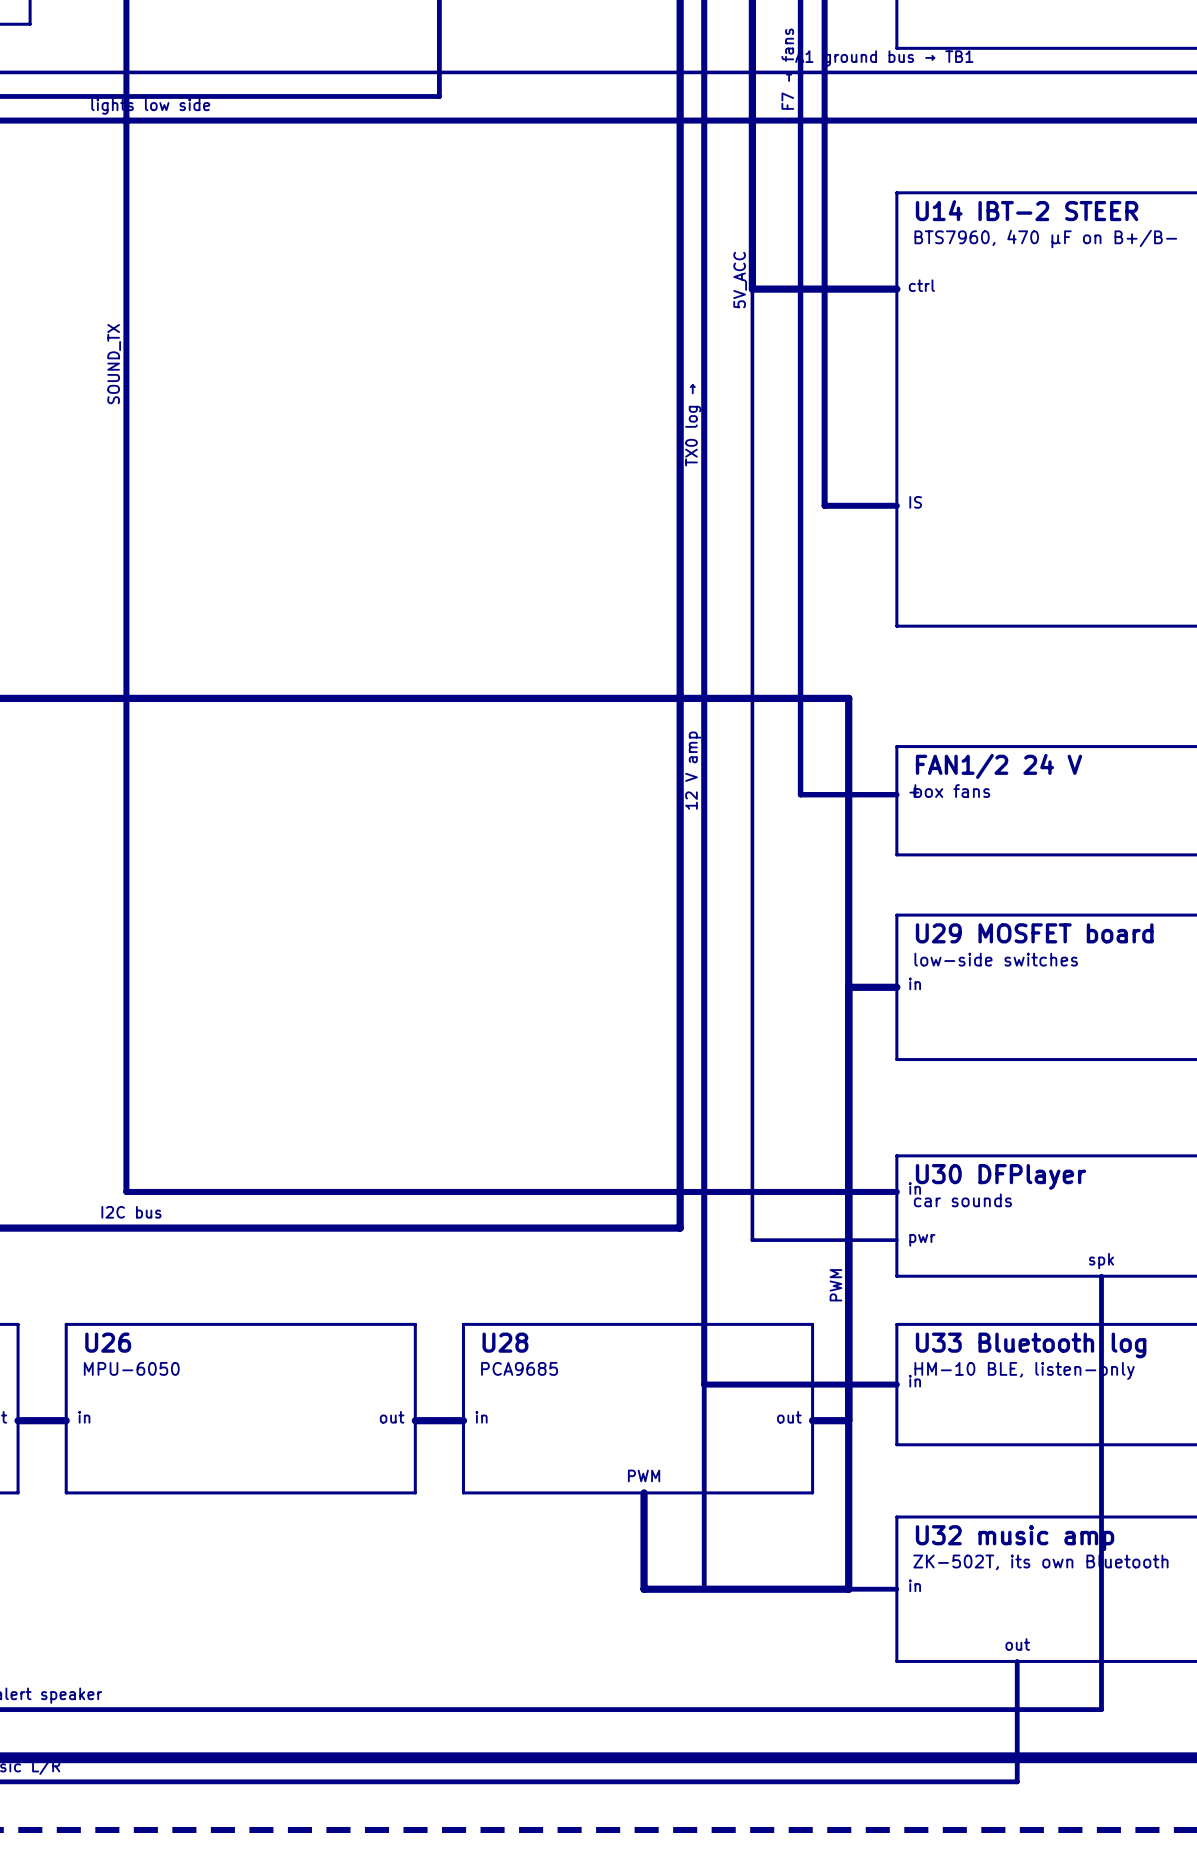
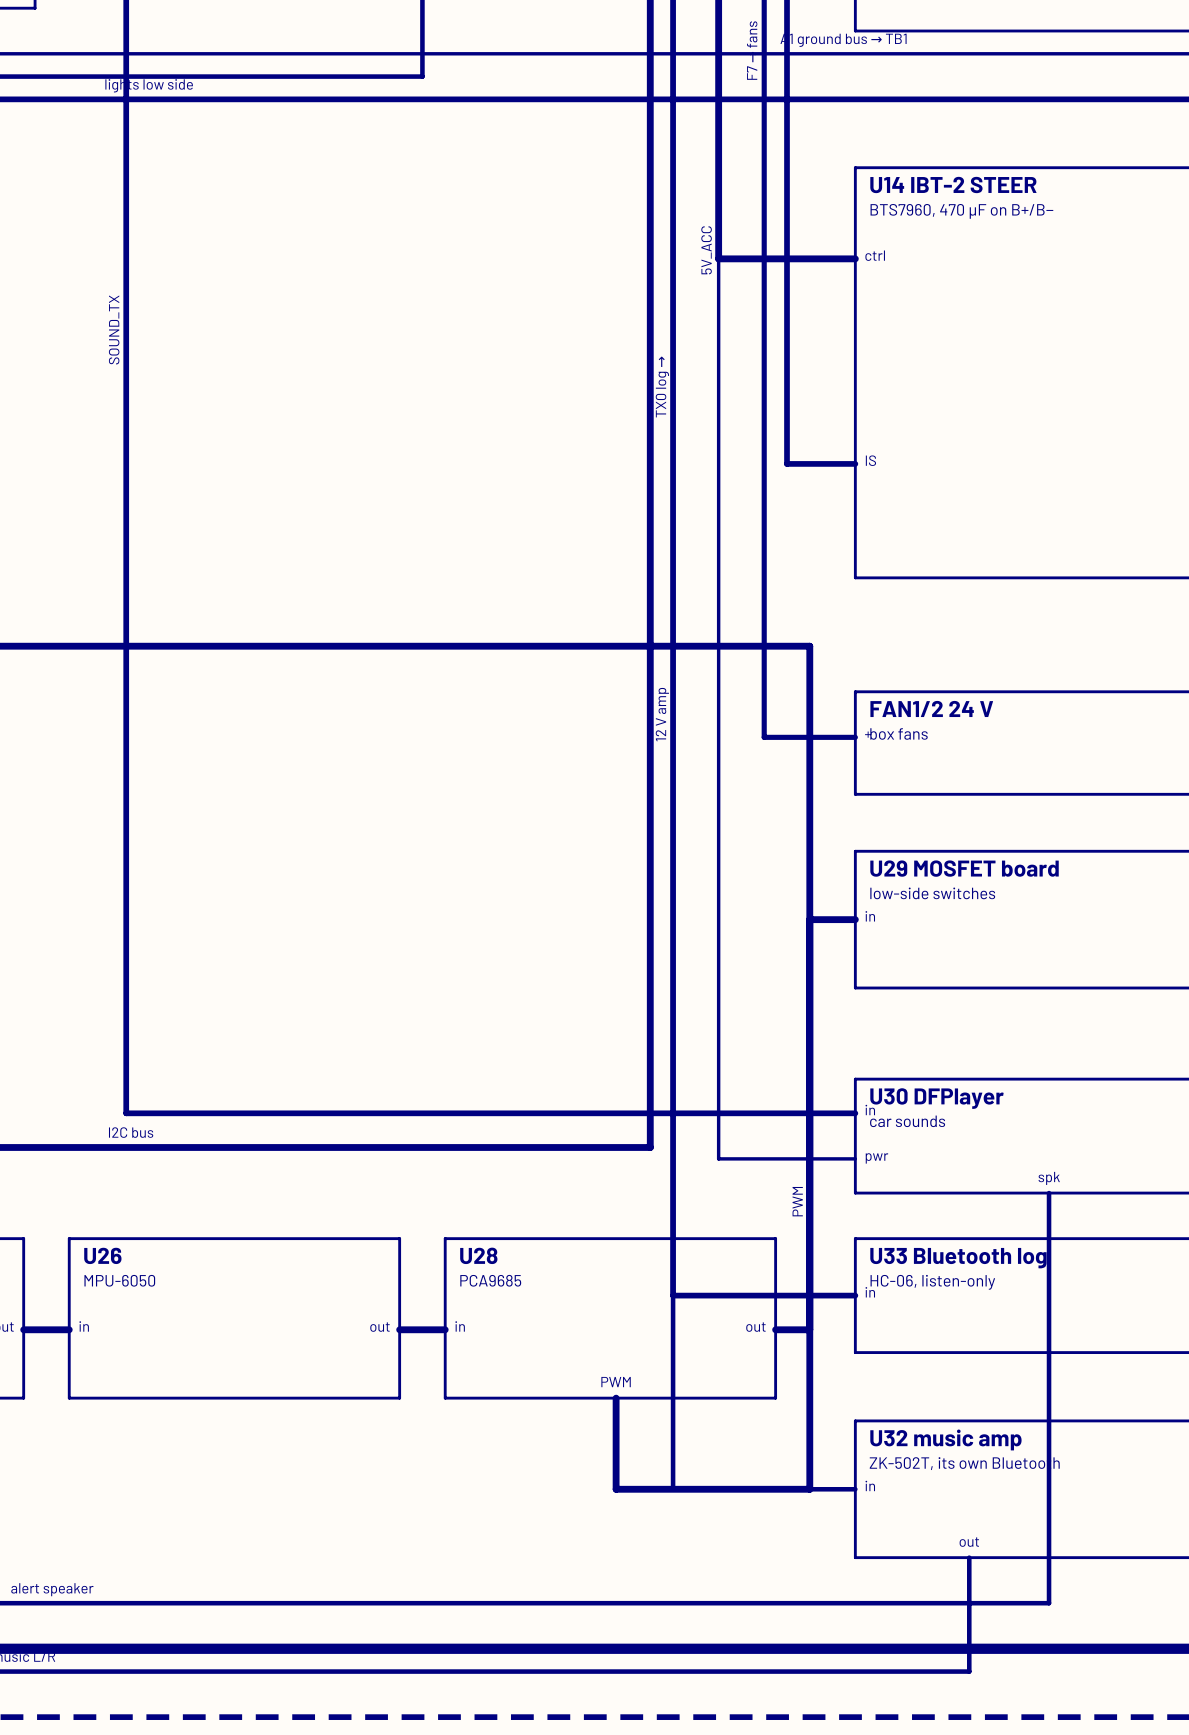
text: HM-10 BLE, listen-only (1024, 1370) -> HC-06, listen-only (932, 1282)

